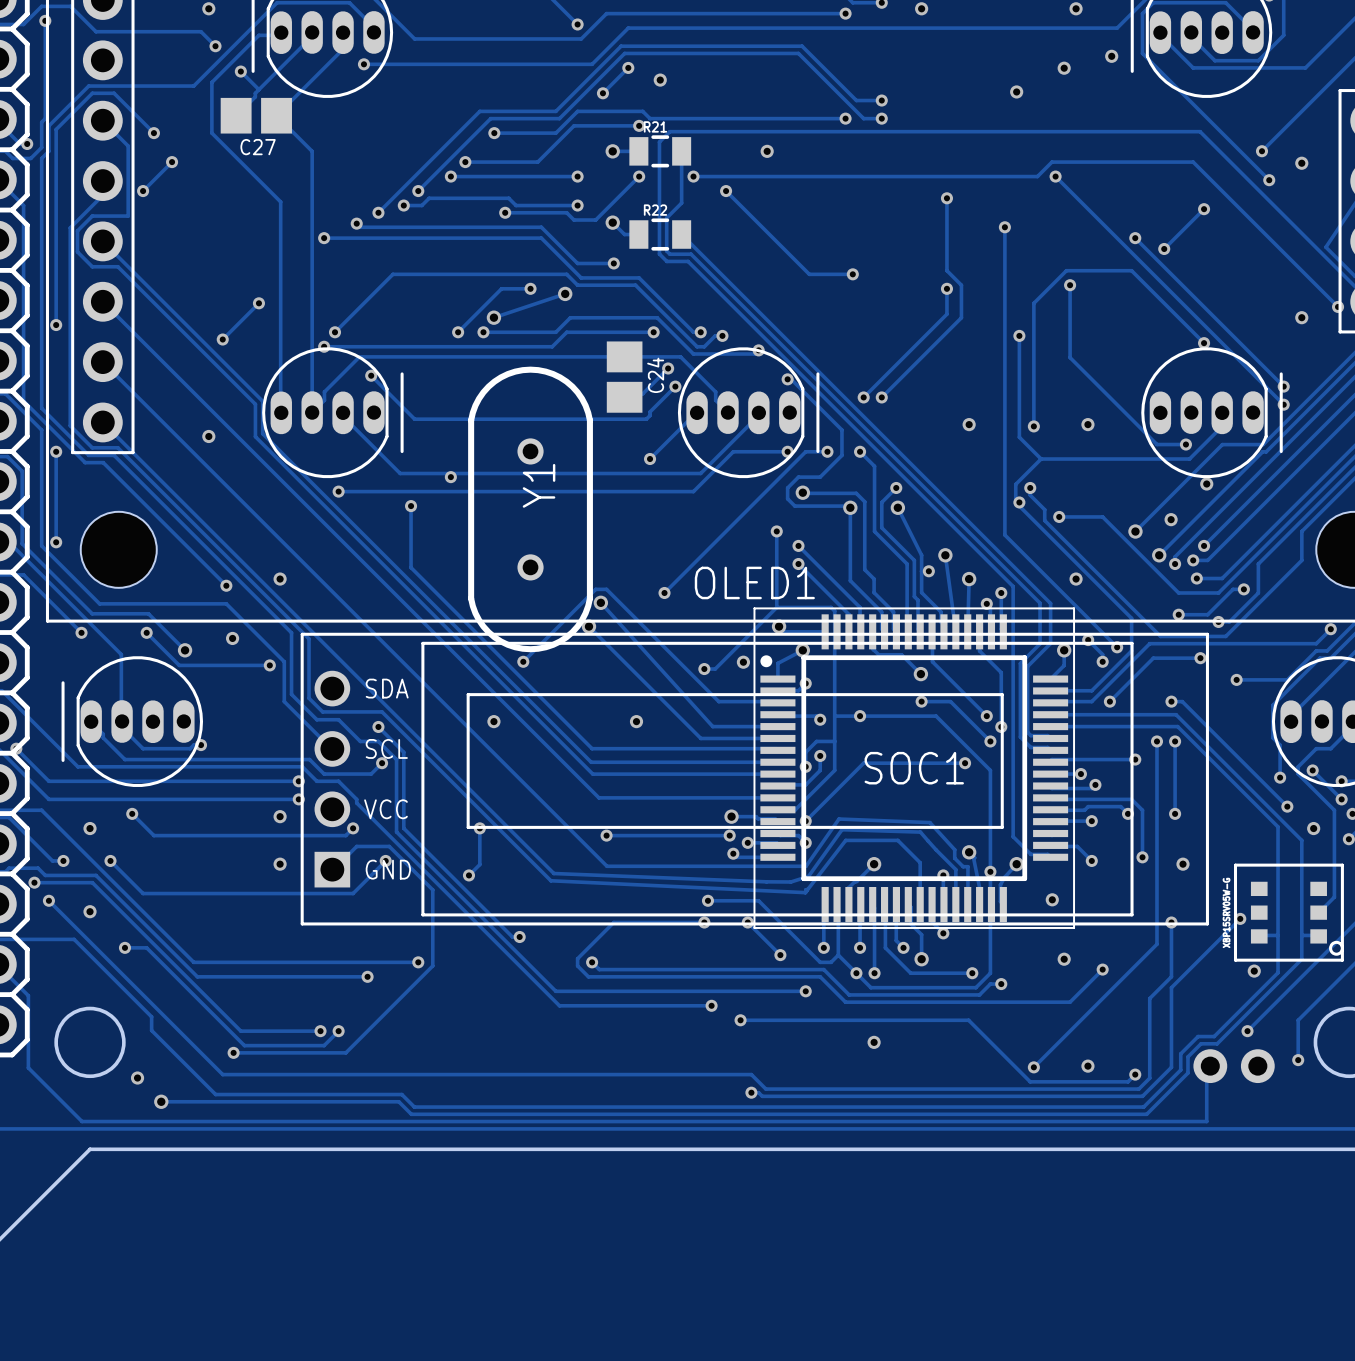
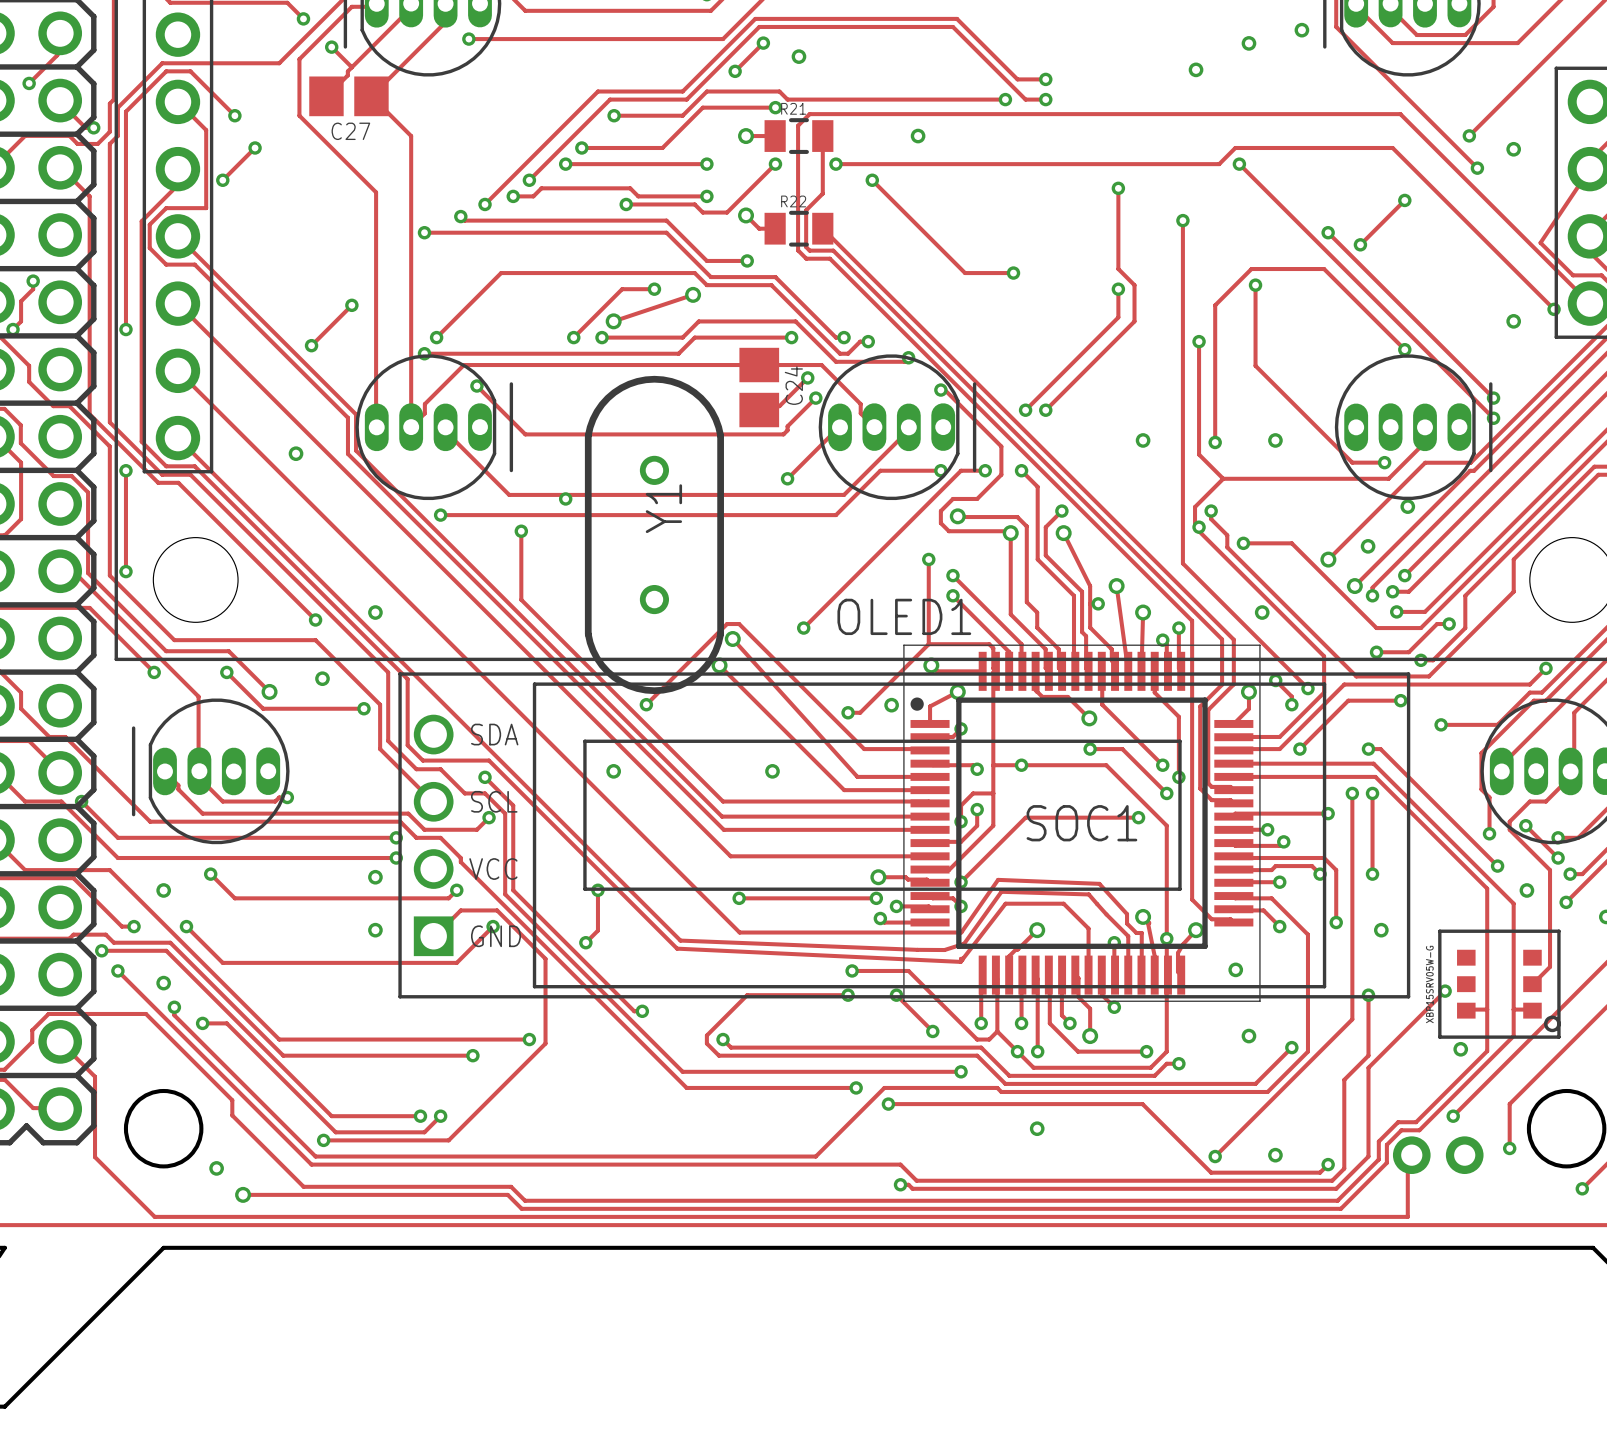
track: none -> (1235, 898) (1271, 898) (1307, 934) (1307, 1051) (1267, 1091) (1001, 1091) (997, 1087) (884, 1087) (815, 1156) (315, 1156) (174, 1015) (174, 1007)
via: none -> (174, 1007)

